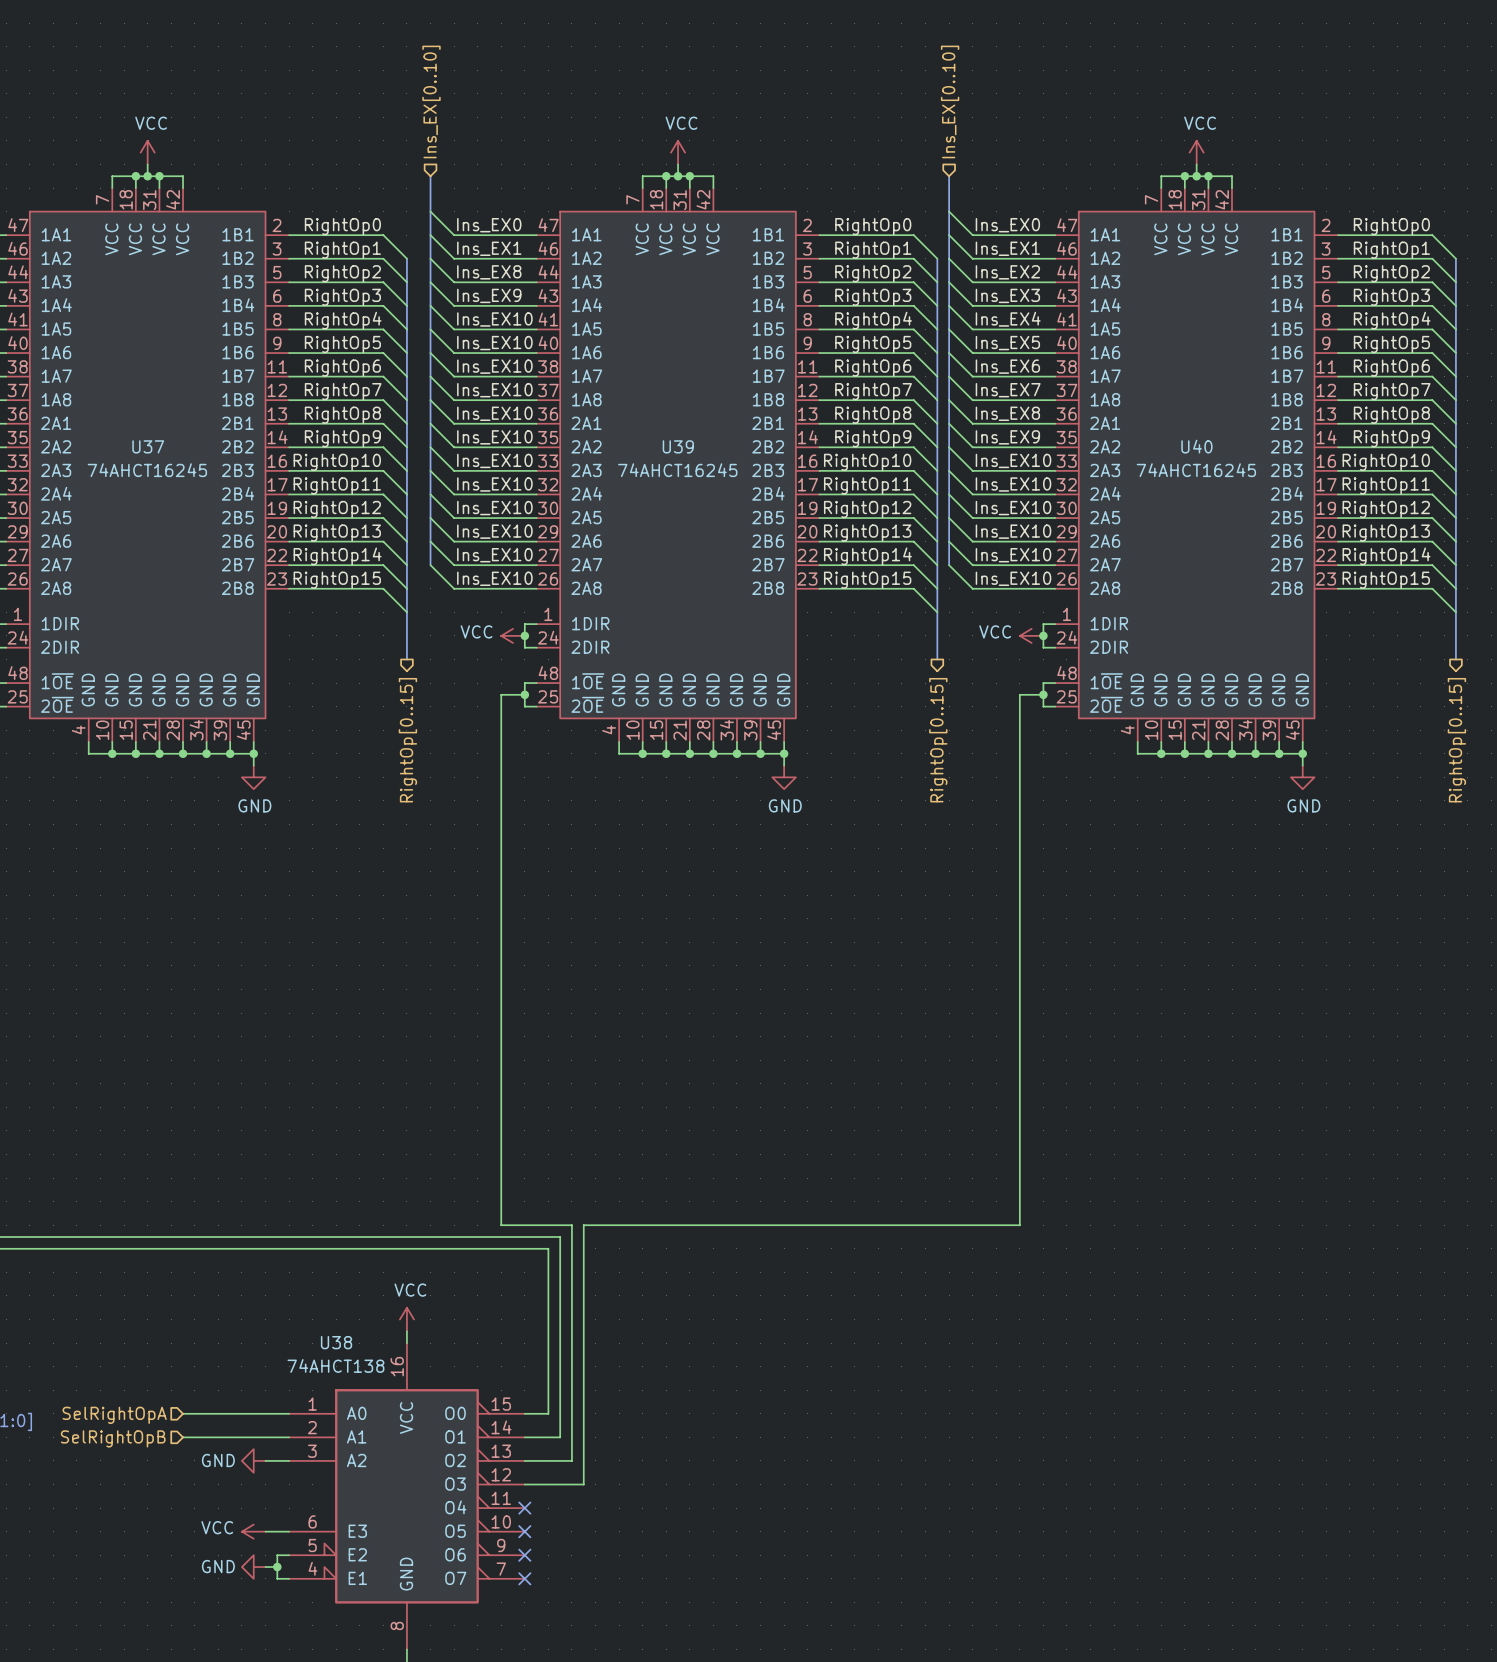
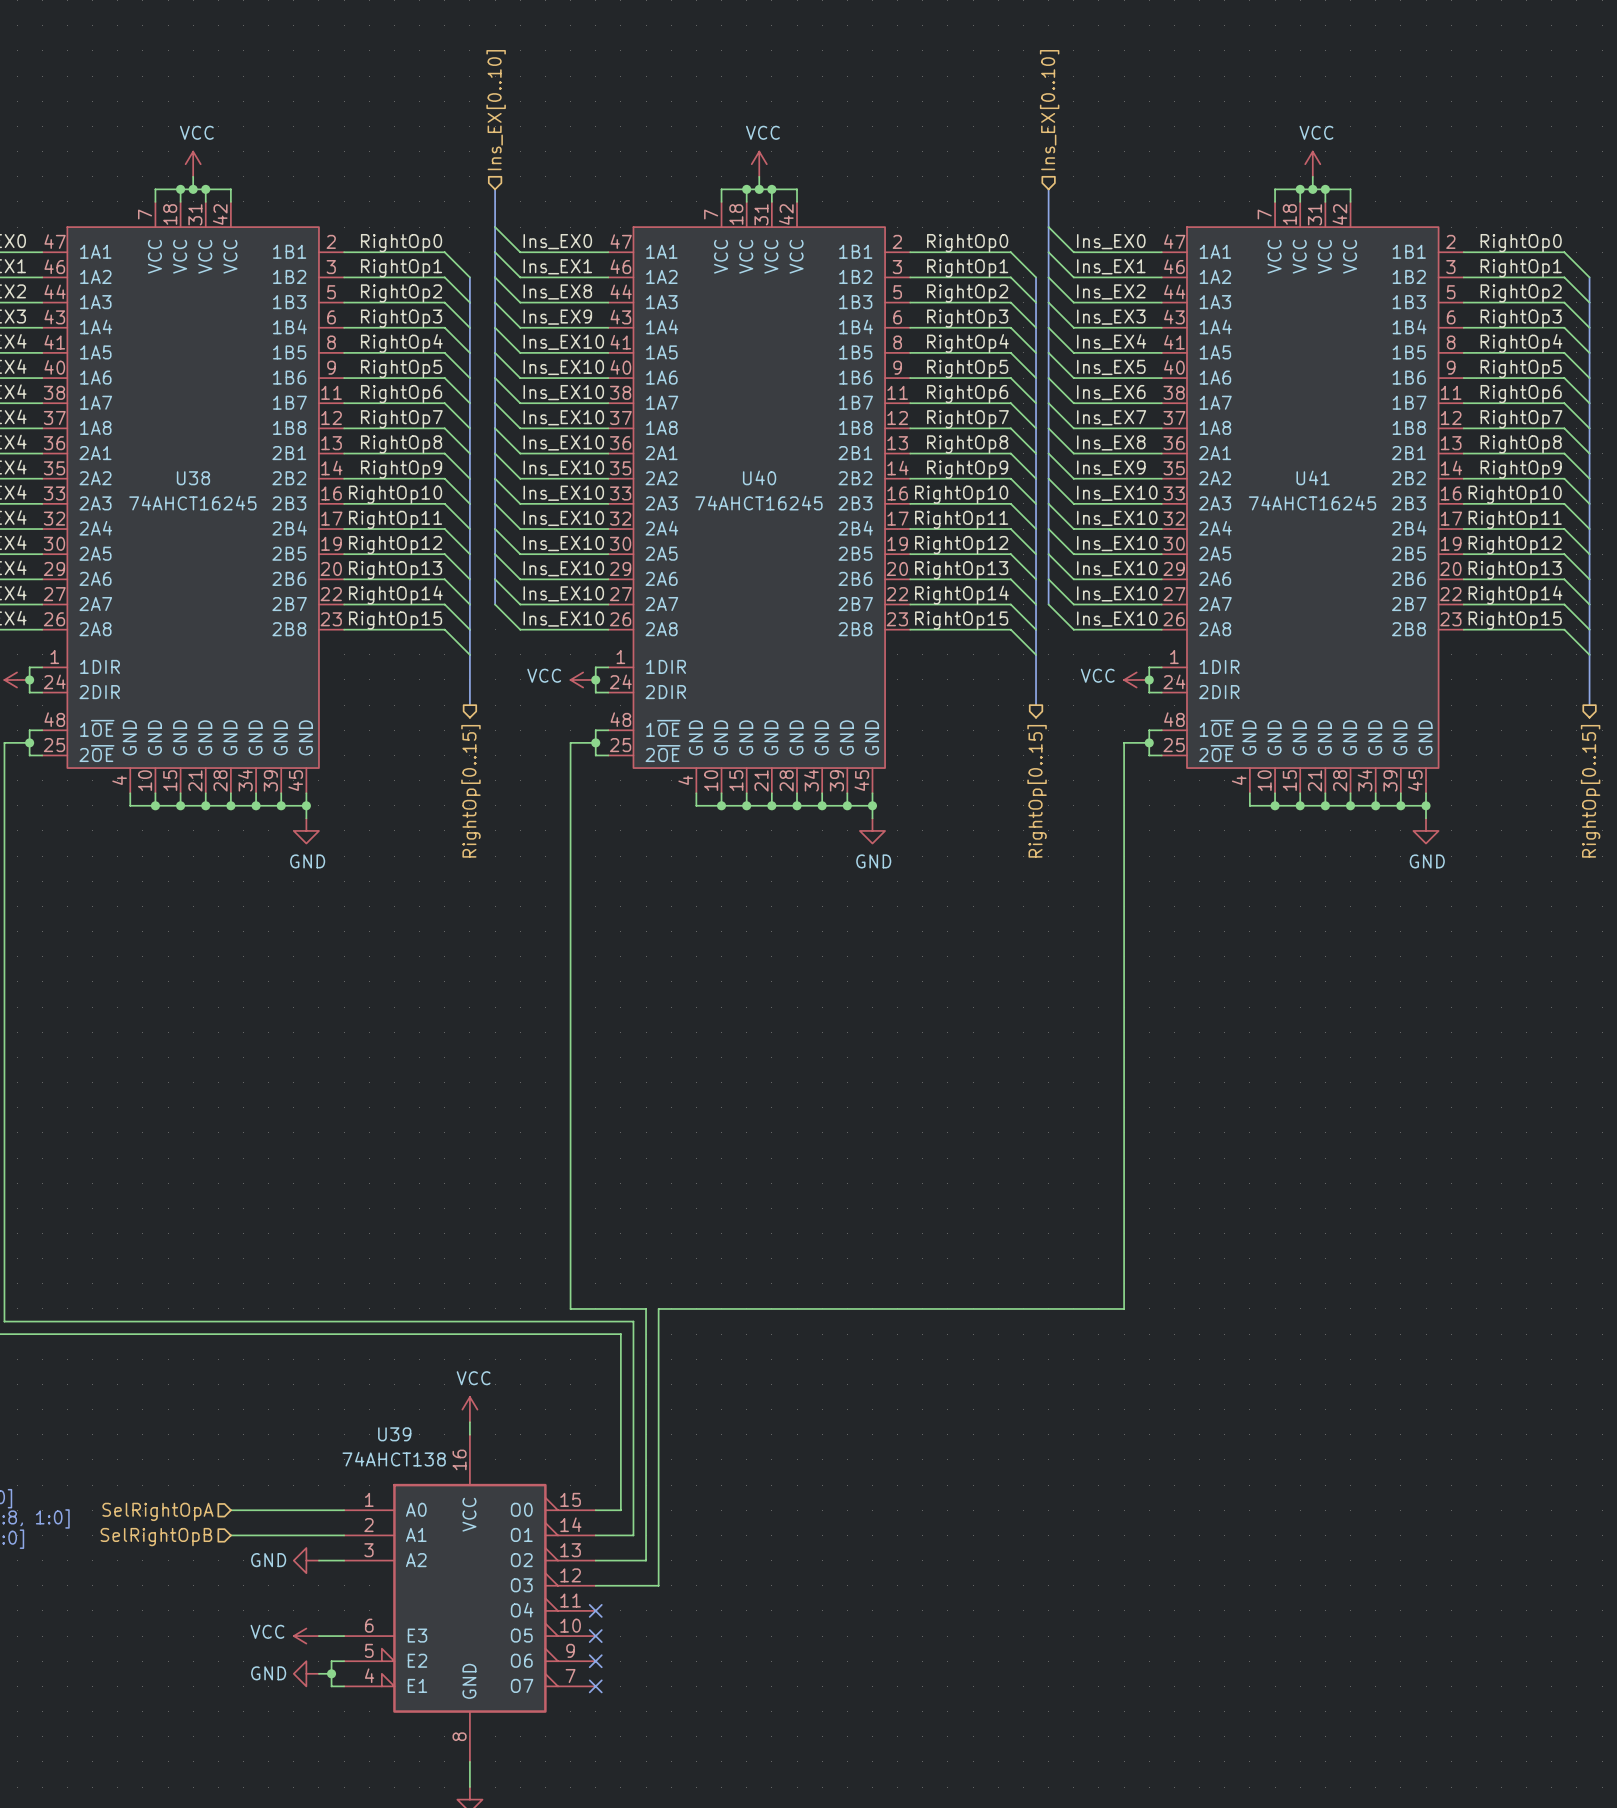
U37 name: U37 (148, 446) -> U38 (193, 478)
U39 name: U39 (678, 446) -> U40 (759, 477)
U40 name: U40 (1196, 446) -> U41 (1313, 477)
U38 name: U38 (336, 1342) -> U39 (394, 1434)

